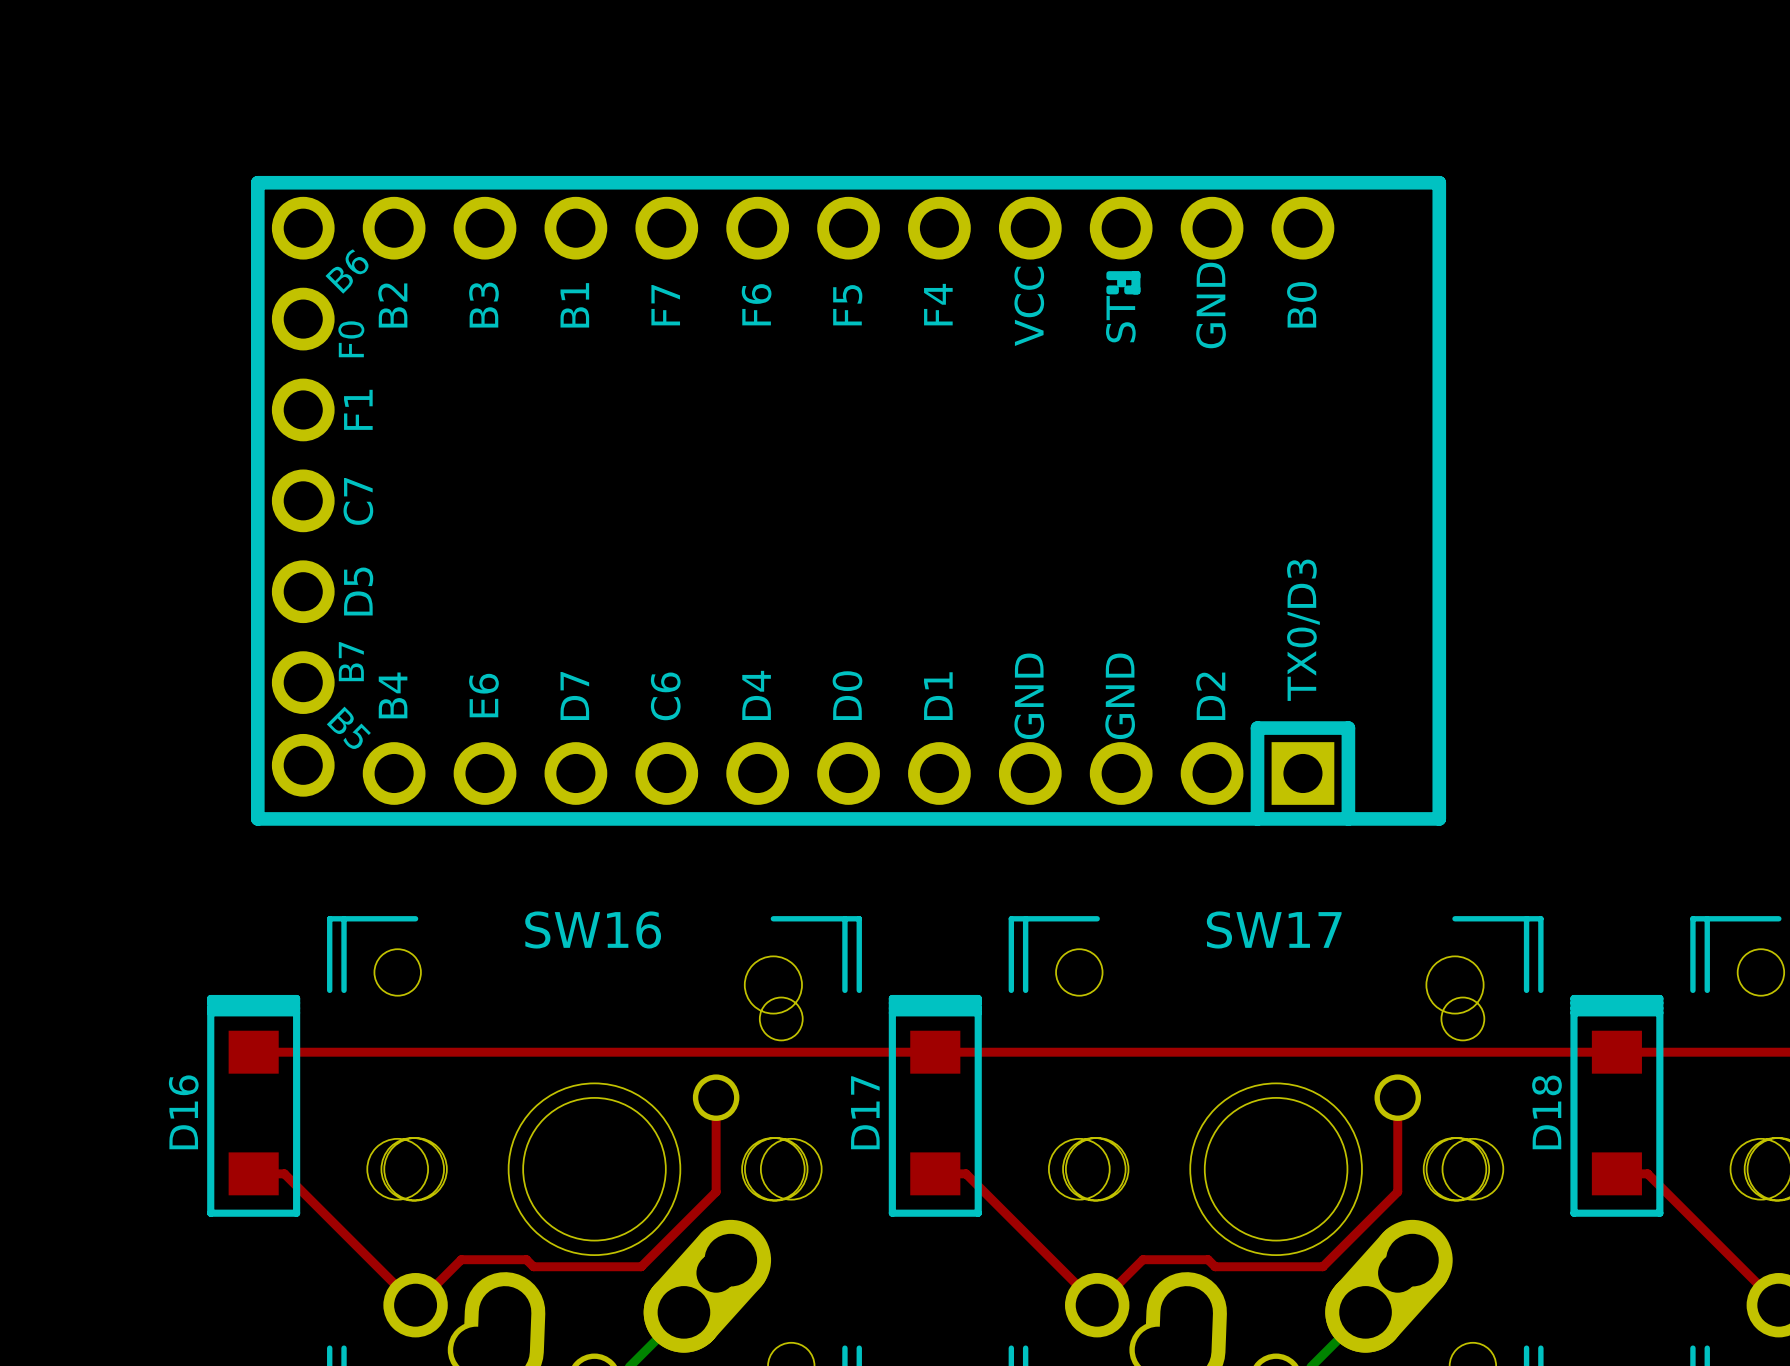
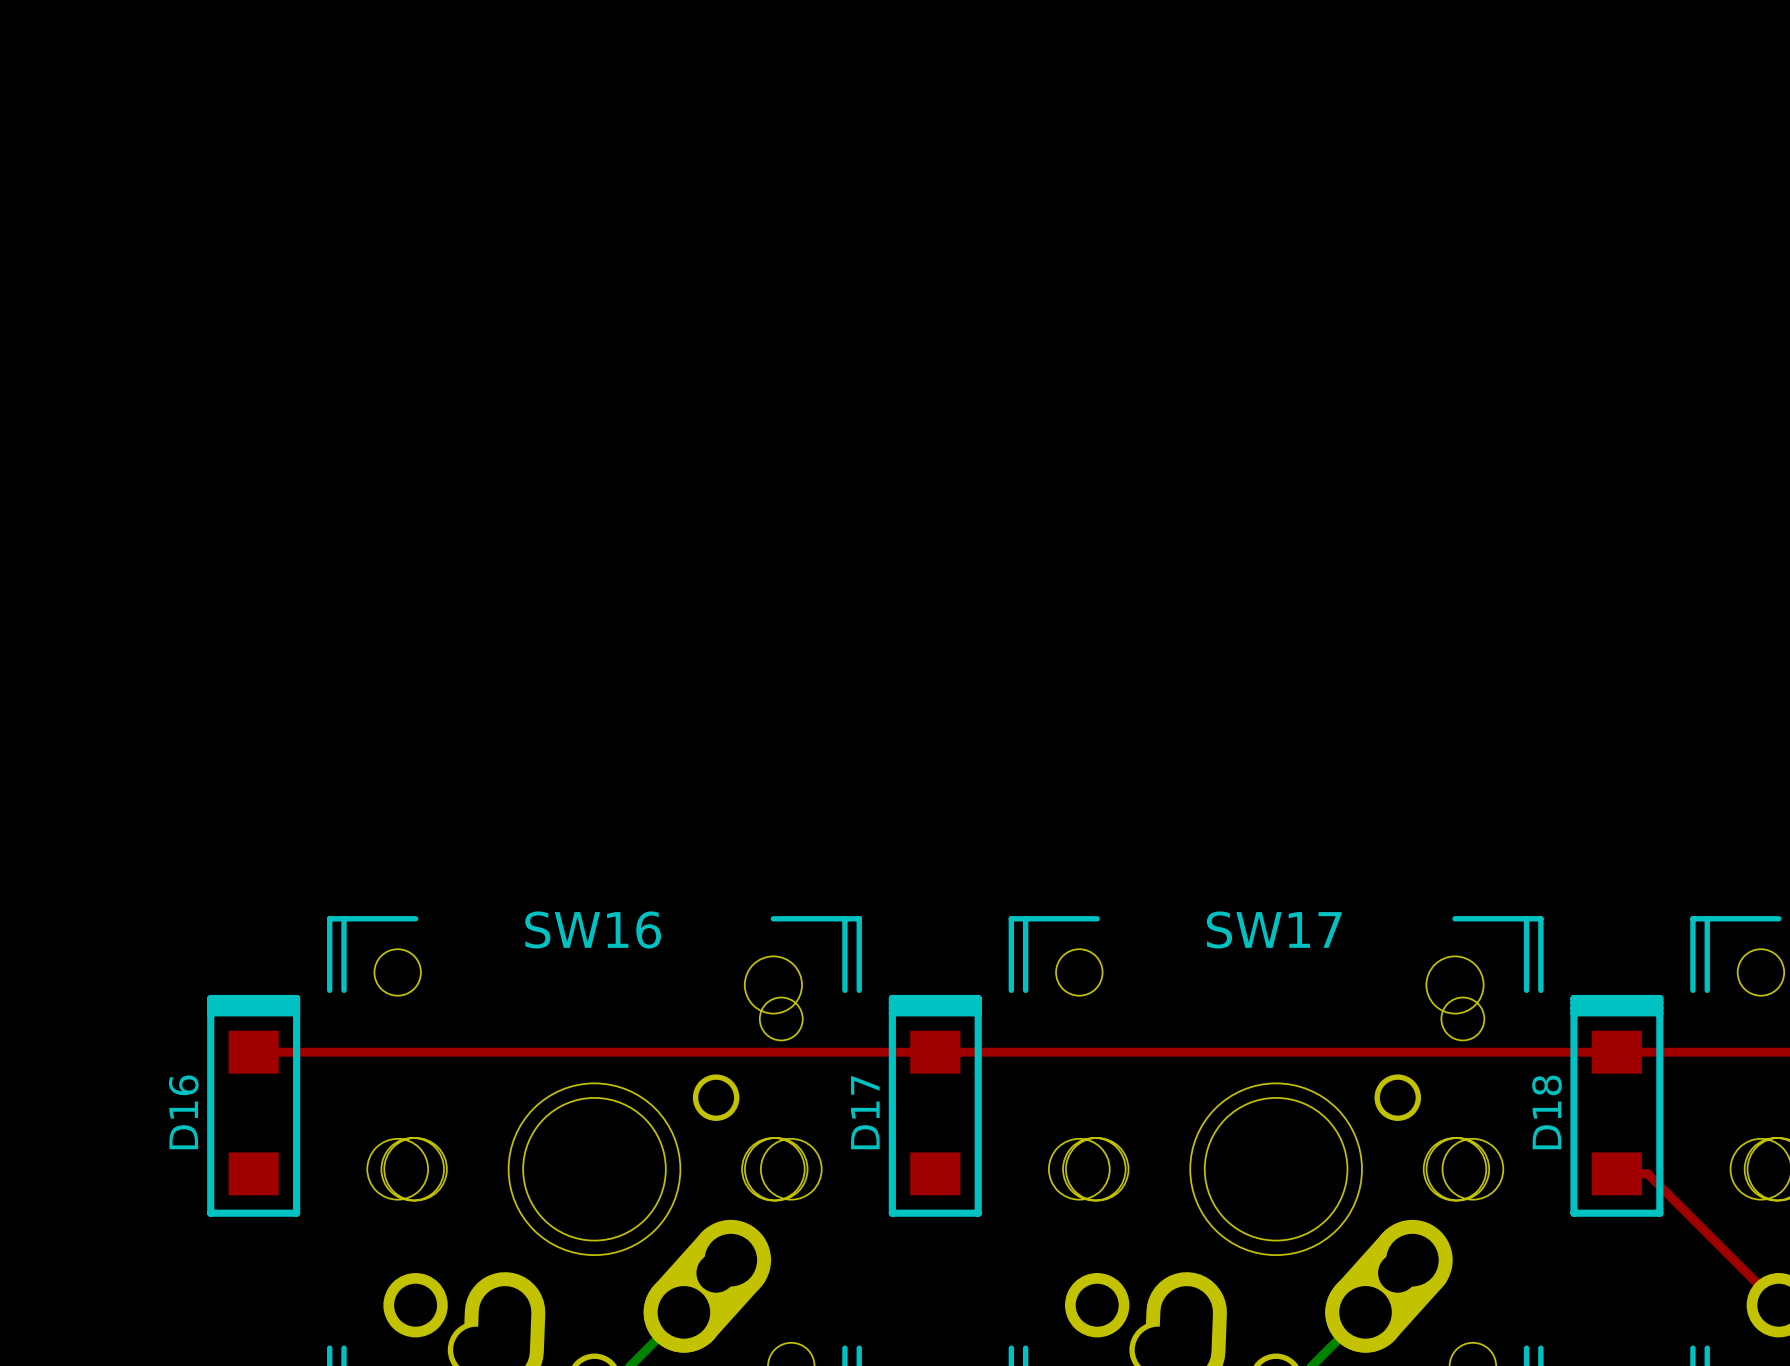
part: (848, 500) -> none
top track: (716, 1097) (716, 1191) (641, 1266) (533, 1266) (526, 1259) (461, 1259) (415, 1305) (284, 1173) (253, 1173) -> none
top track: (1397, 1097) (1397, 1191) (1322, 1266) (1215, 1266) (1208, 1259) (1142, 1259) (1097, 1305) (966, 1173) (935, 1173) -> none

